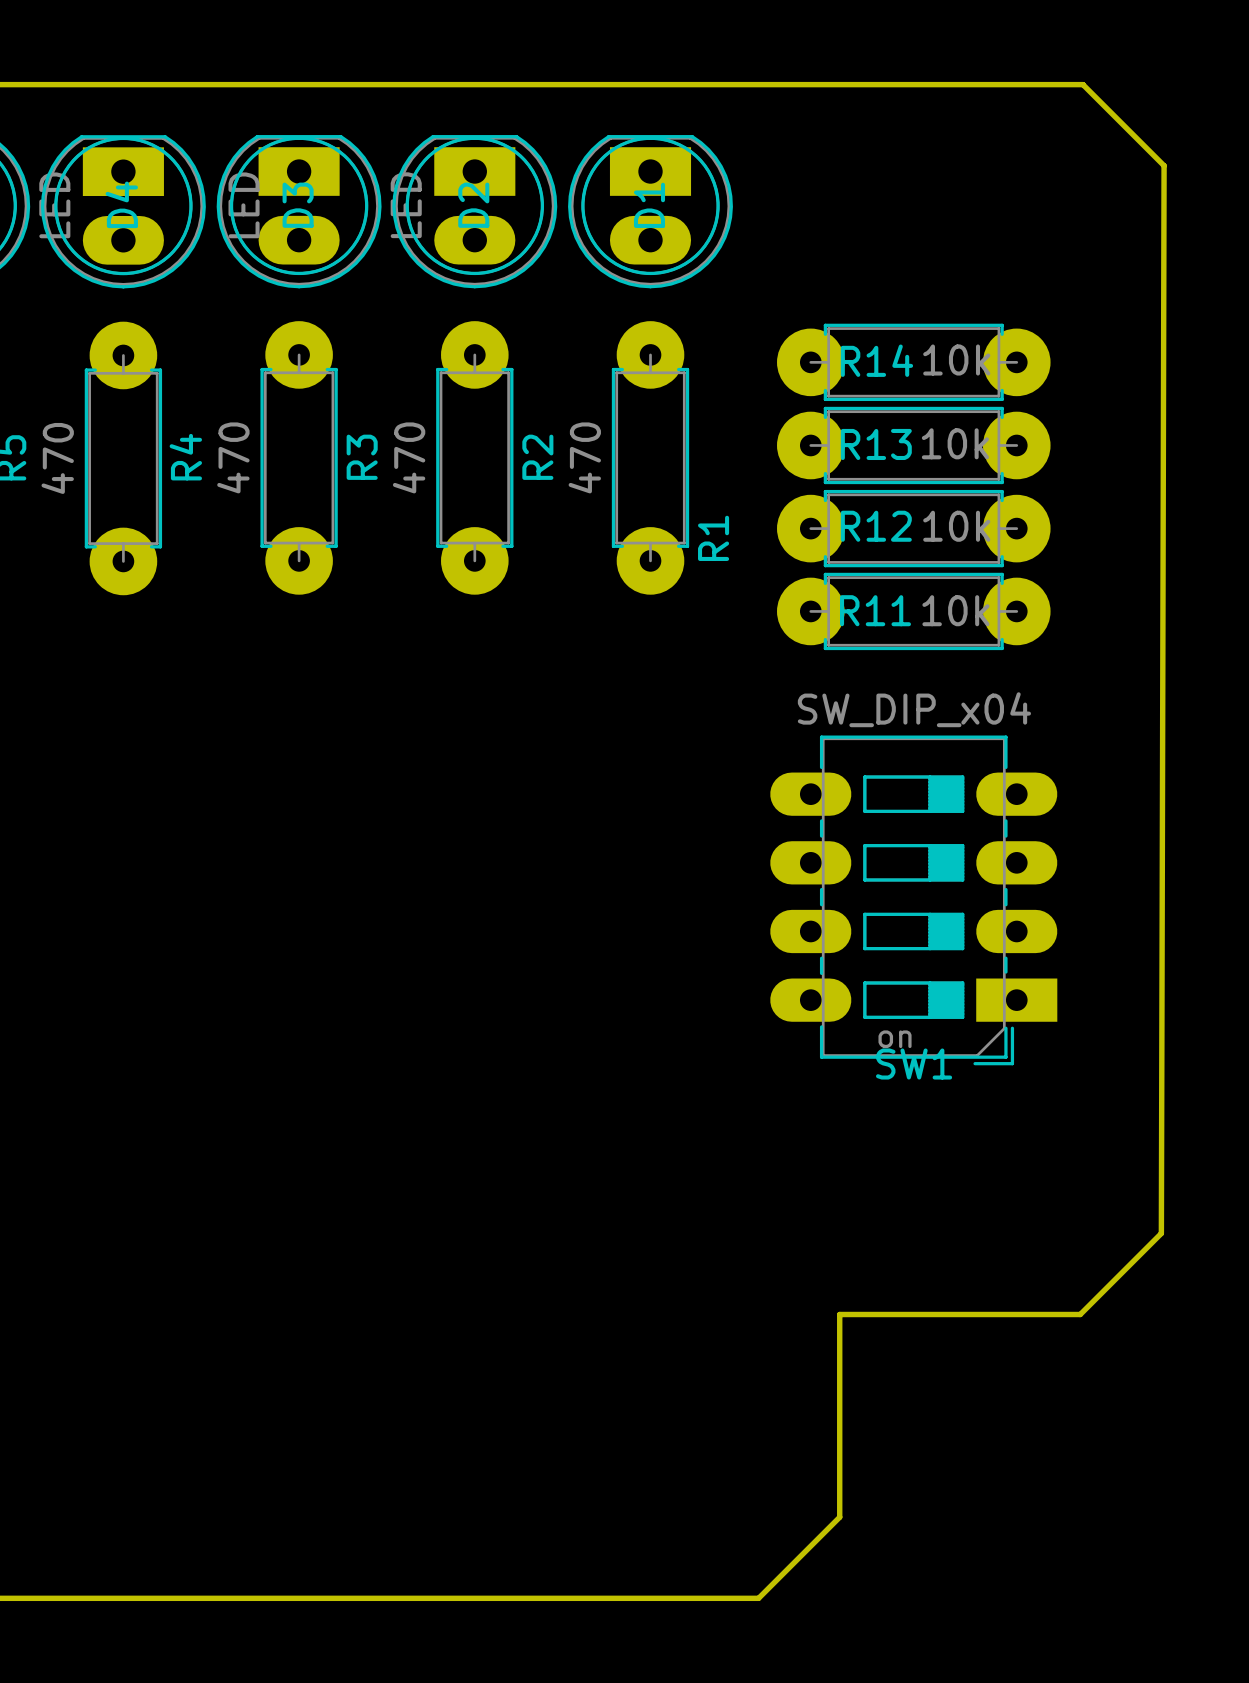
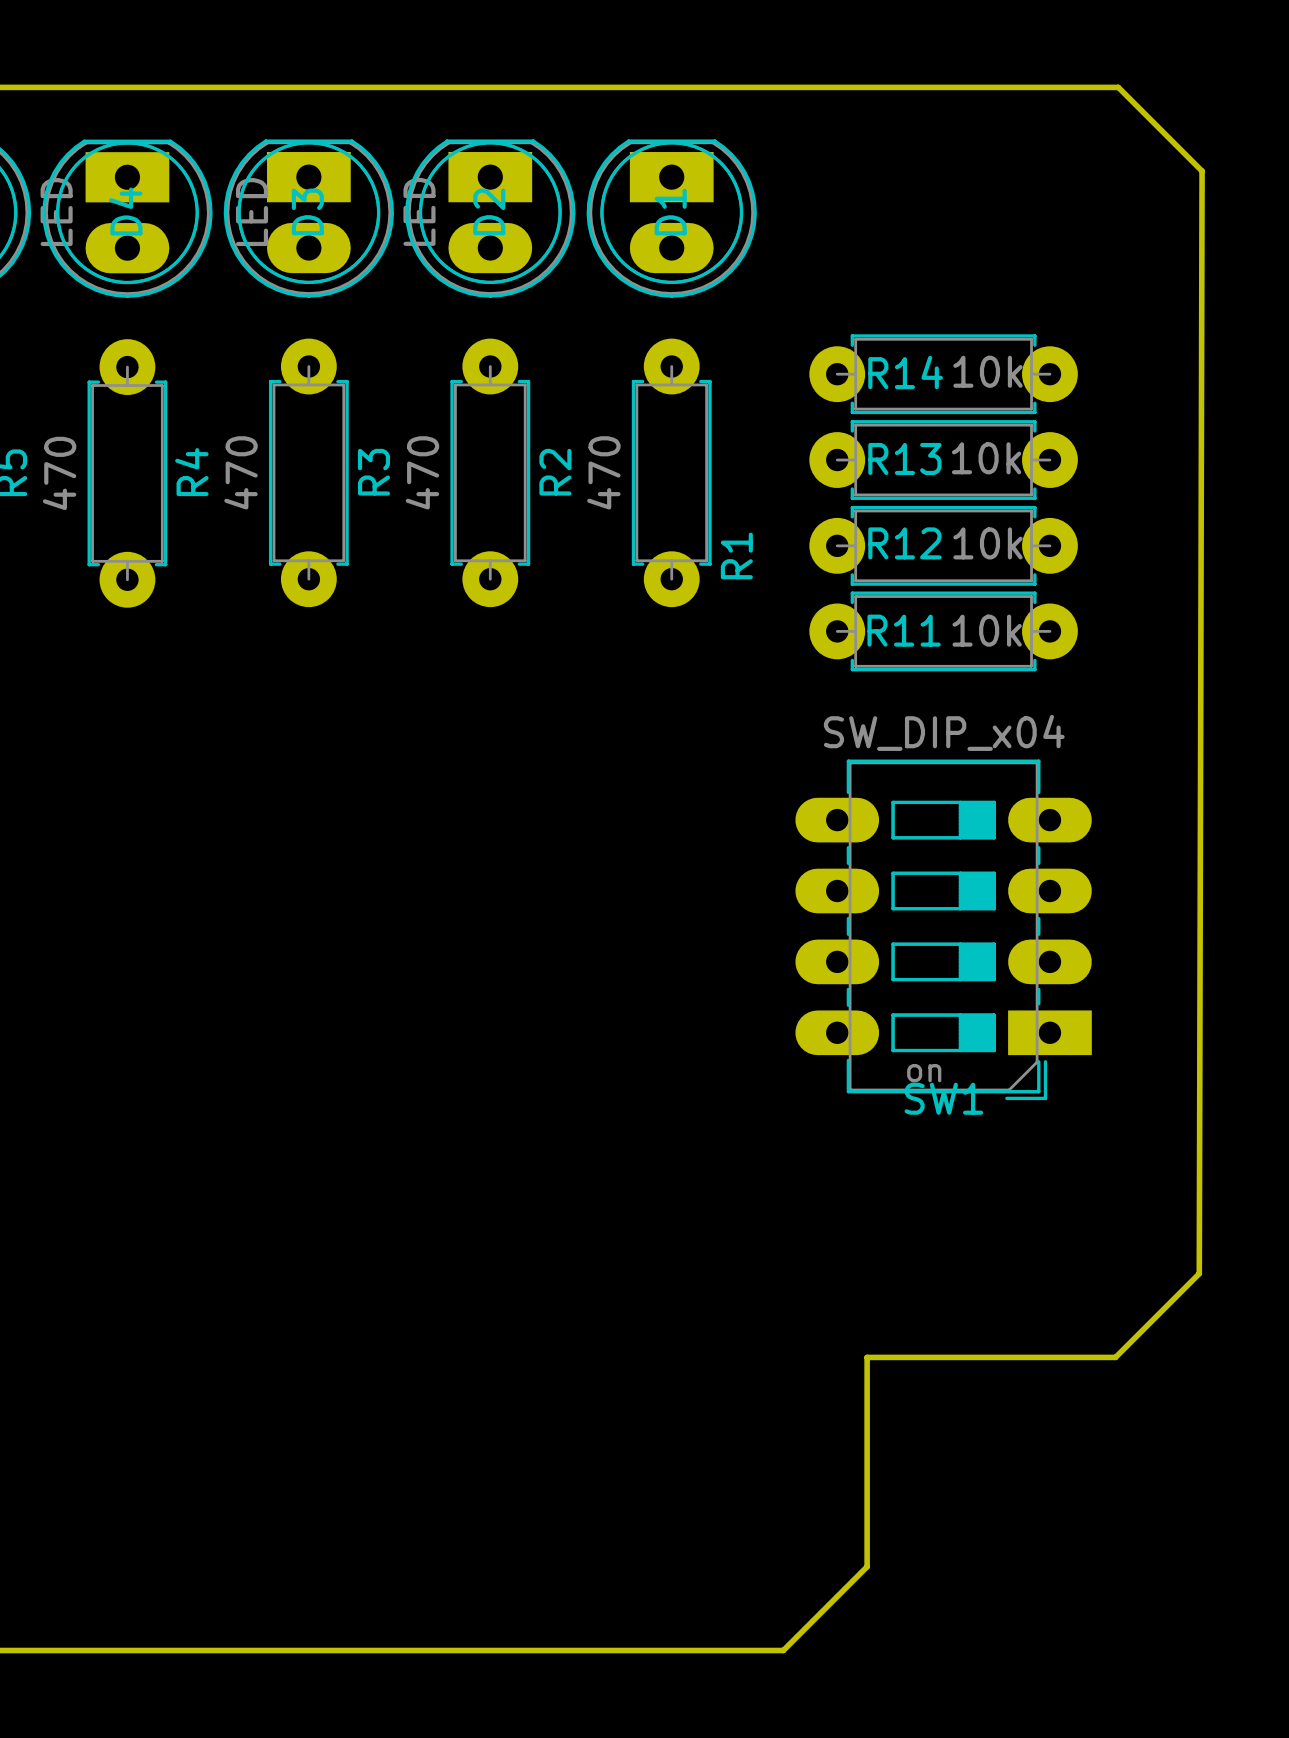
R4 footprint: [84, 321, 163, 596] -> [87, 339, 168, 608]
R3 footprint: [260, 321, 338, 595] -> [268, 338, 349, 608]
R2 footprint: [436, 321, 514, 595] -> [450, 338, 531, 608]
R1 footprint: [611, 321, 690, 595] -> [631, 338, 712, 608]
R14 footprint: [777, 323, 1051, 402] -> [809, 334, 1078, 415]
R13 footprint: [777, 406, 1051, 485] -> [809, 420, 1078, 500]
R12 footprint: [777, 489, 1051, 568] -> [809, 505, 1078, 586]
R11 footprint: [777, 572, 1051, 651] -> [809, 591, 1078, 672]

